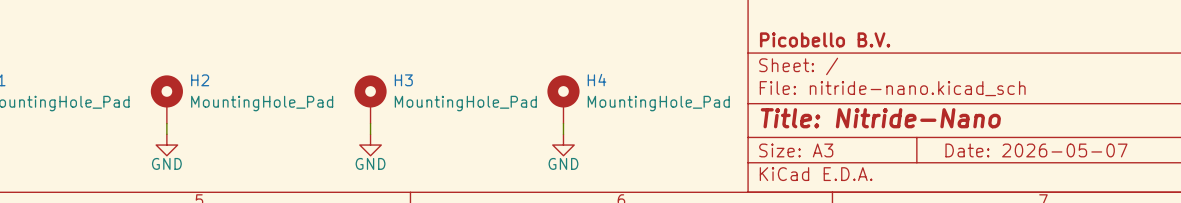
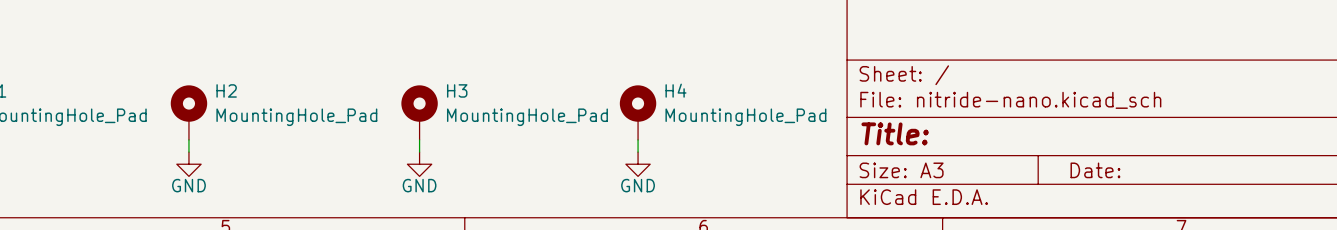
title block: Picobello B.V. (825, 39) -> none
title block: Title: Nitride-Nano (880, 118) -> Title: (895, 133)
title block: Date: 2026-05-07 (1036, 150) -> Date: (1095, 170)

